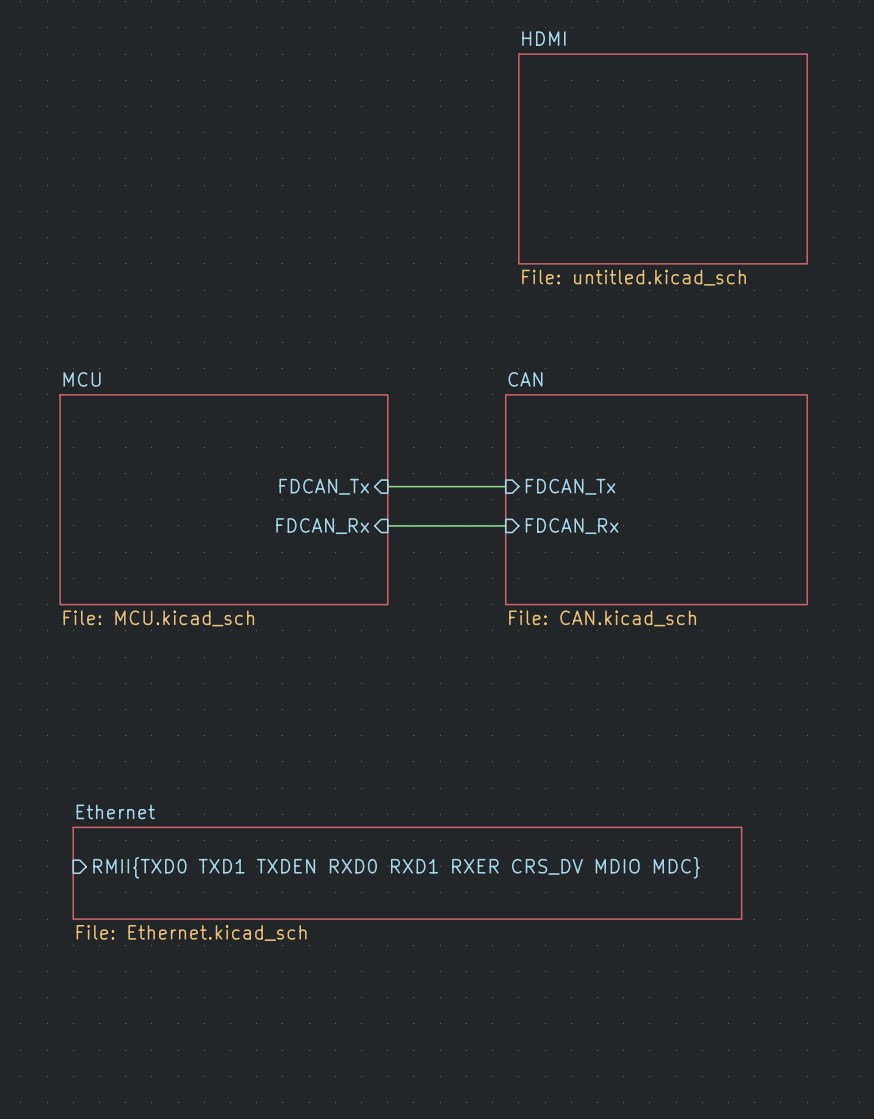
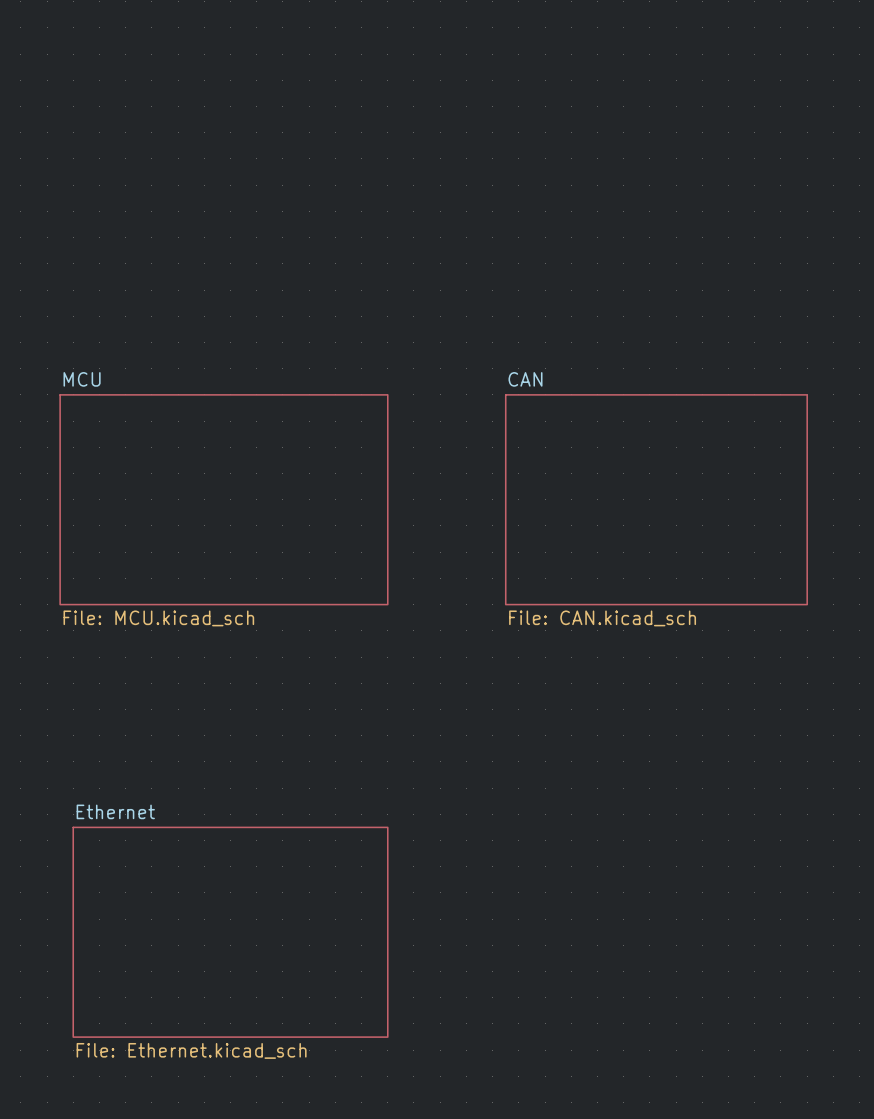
sheet HDMI: File: untitled.kicad_sch (663, 158) -> none
sheet pin: FDCAN_Tx (324, 486) -> none
wire: (387, 486) (505, 486) -> none
sheet pin: FDCAN_Tx (570, 486) -> none
wire: (387, 525) (505, 525) -> none
sheet pin: FDCAN_Rx (322, 526) -> none
sheet pin: FDCAN_Rx (572, 526) -> none
sheet pin: RMII{TXD0 TXD1 TXDEN RXD0 RXD1 RXER CRS_DV MDIO MDC} (396, 867) -> none
sheet Ethernet: File: Ethernet.kicad_sch (407, 873) -> none
sheet Ethernet: none -> File: Ethernet.kicad_sch (230, 932)

